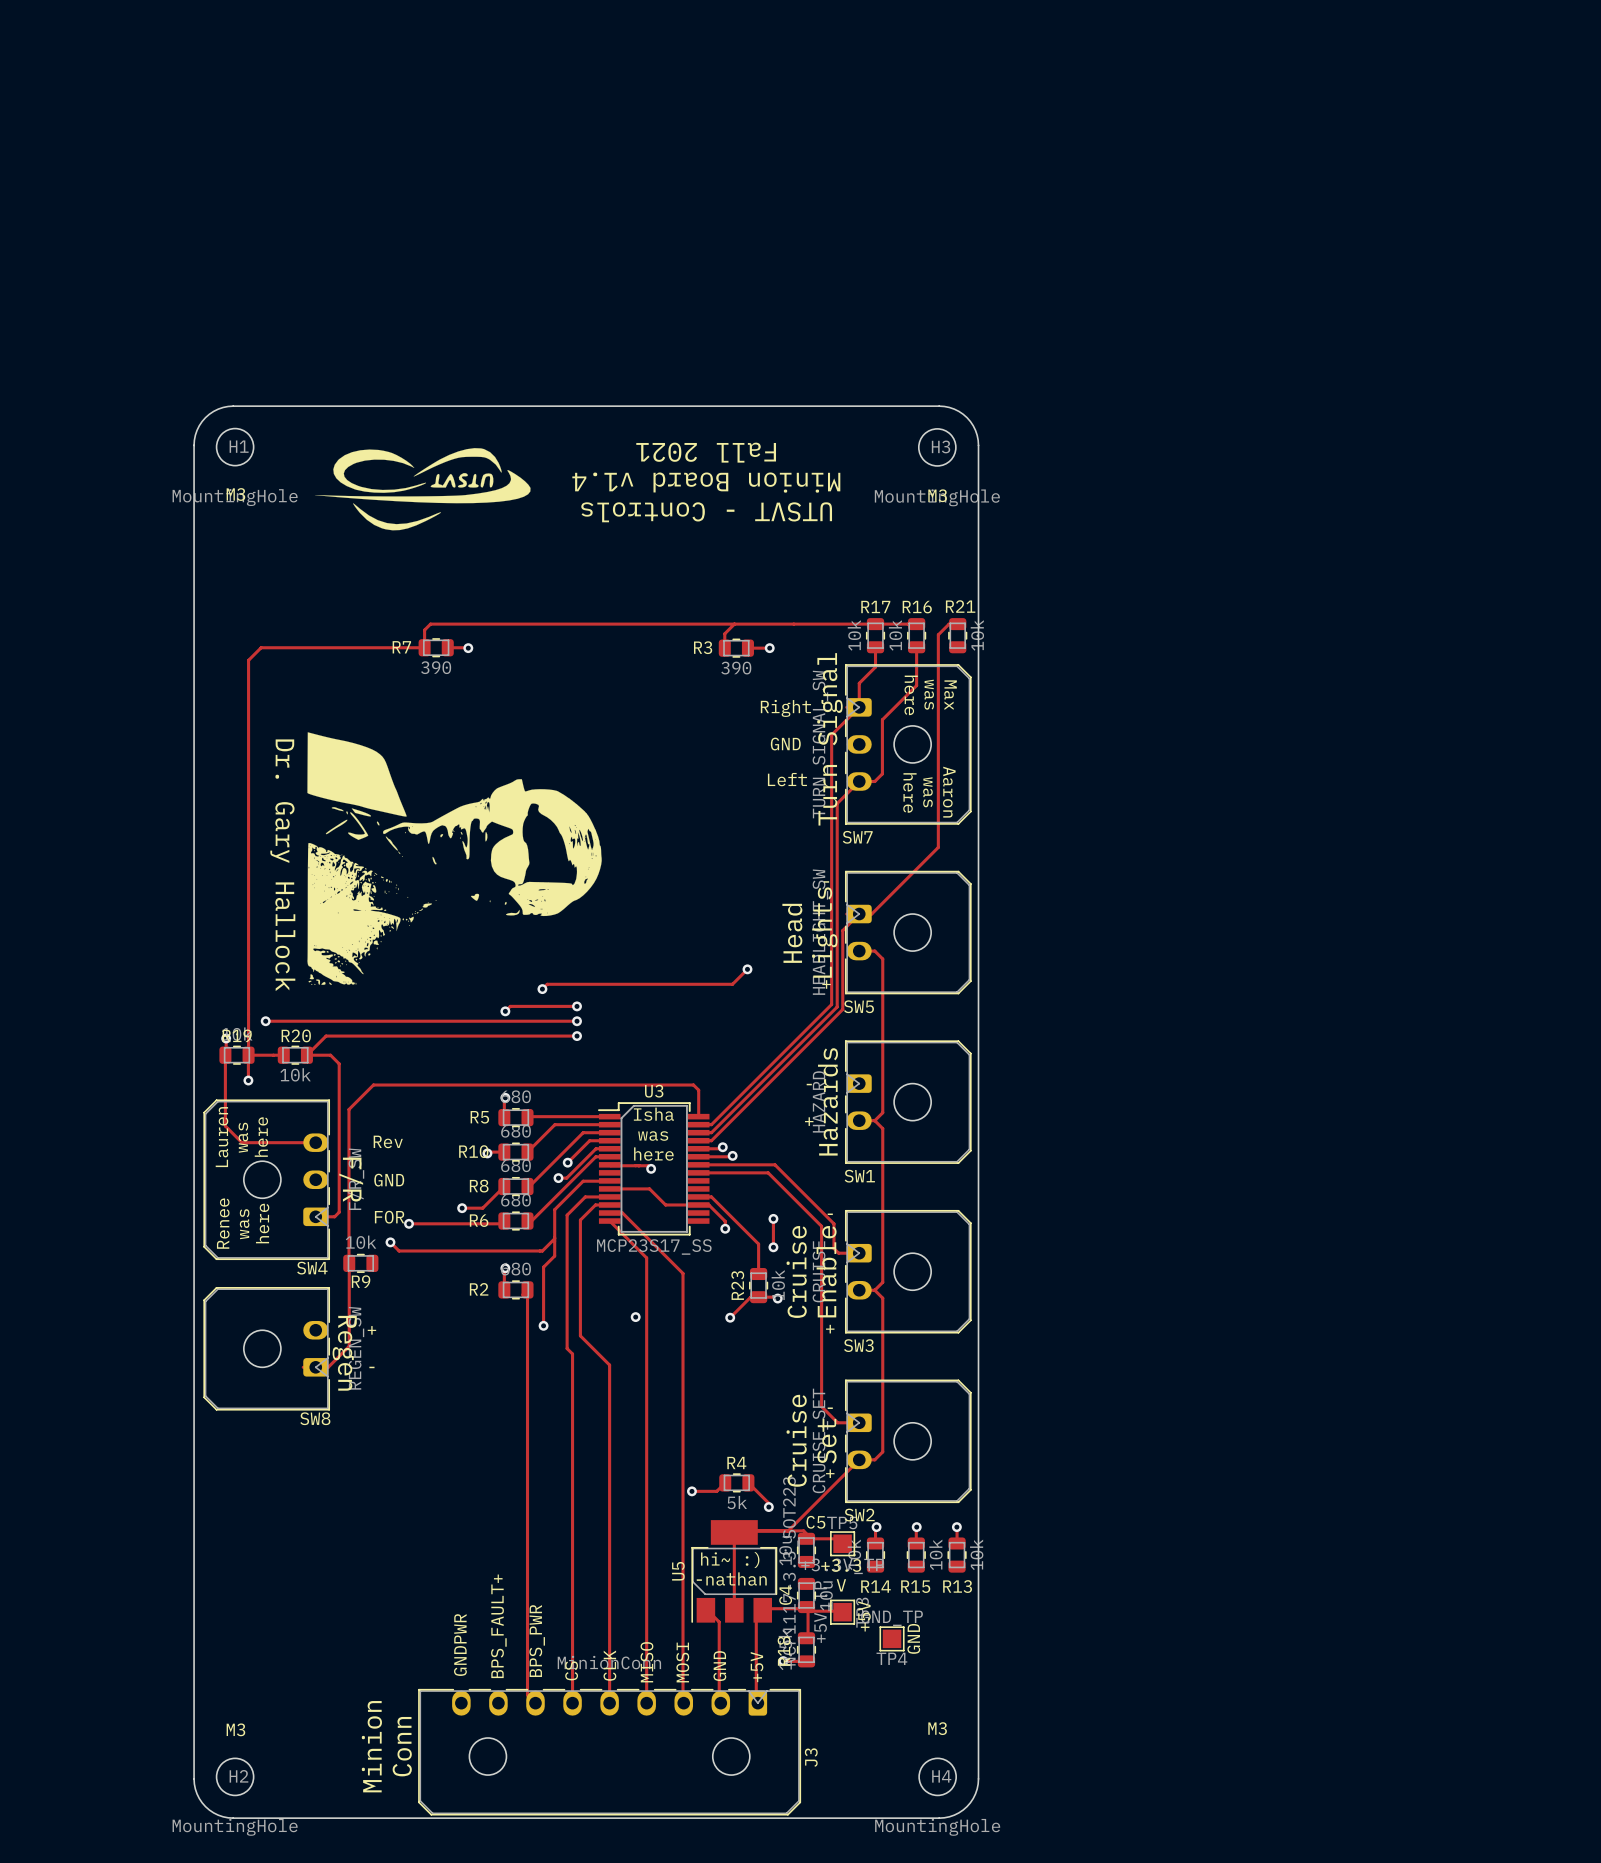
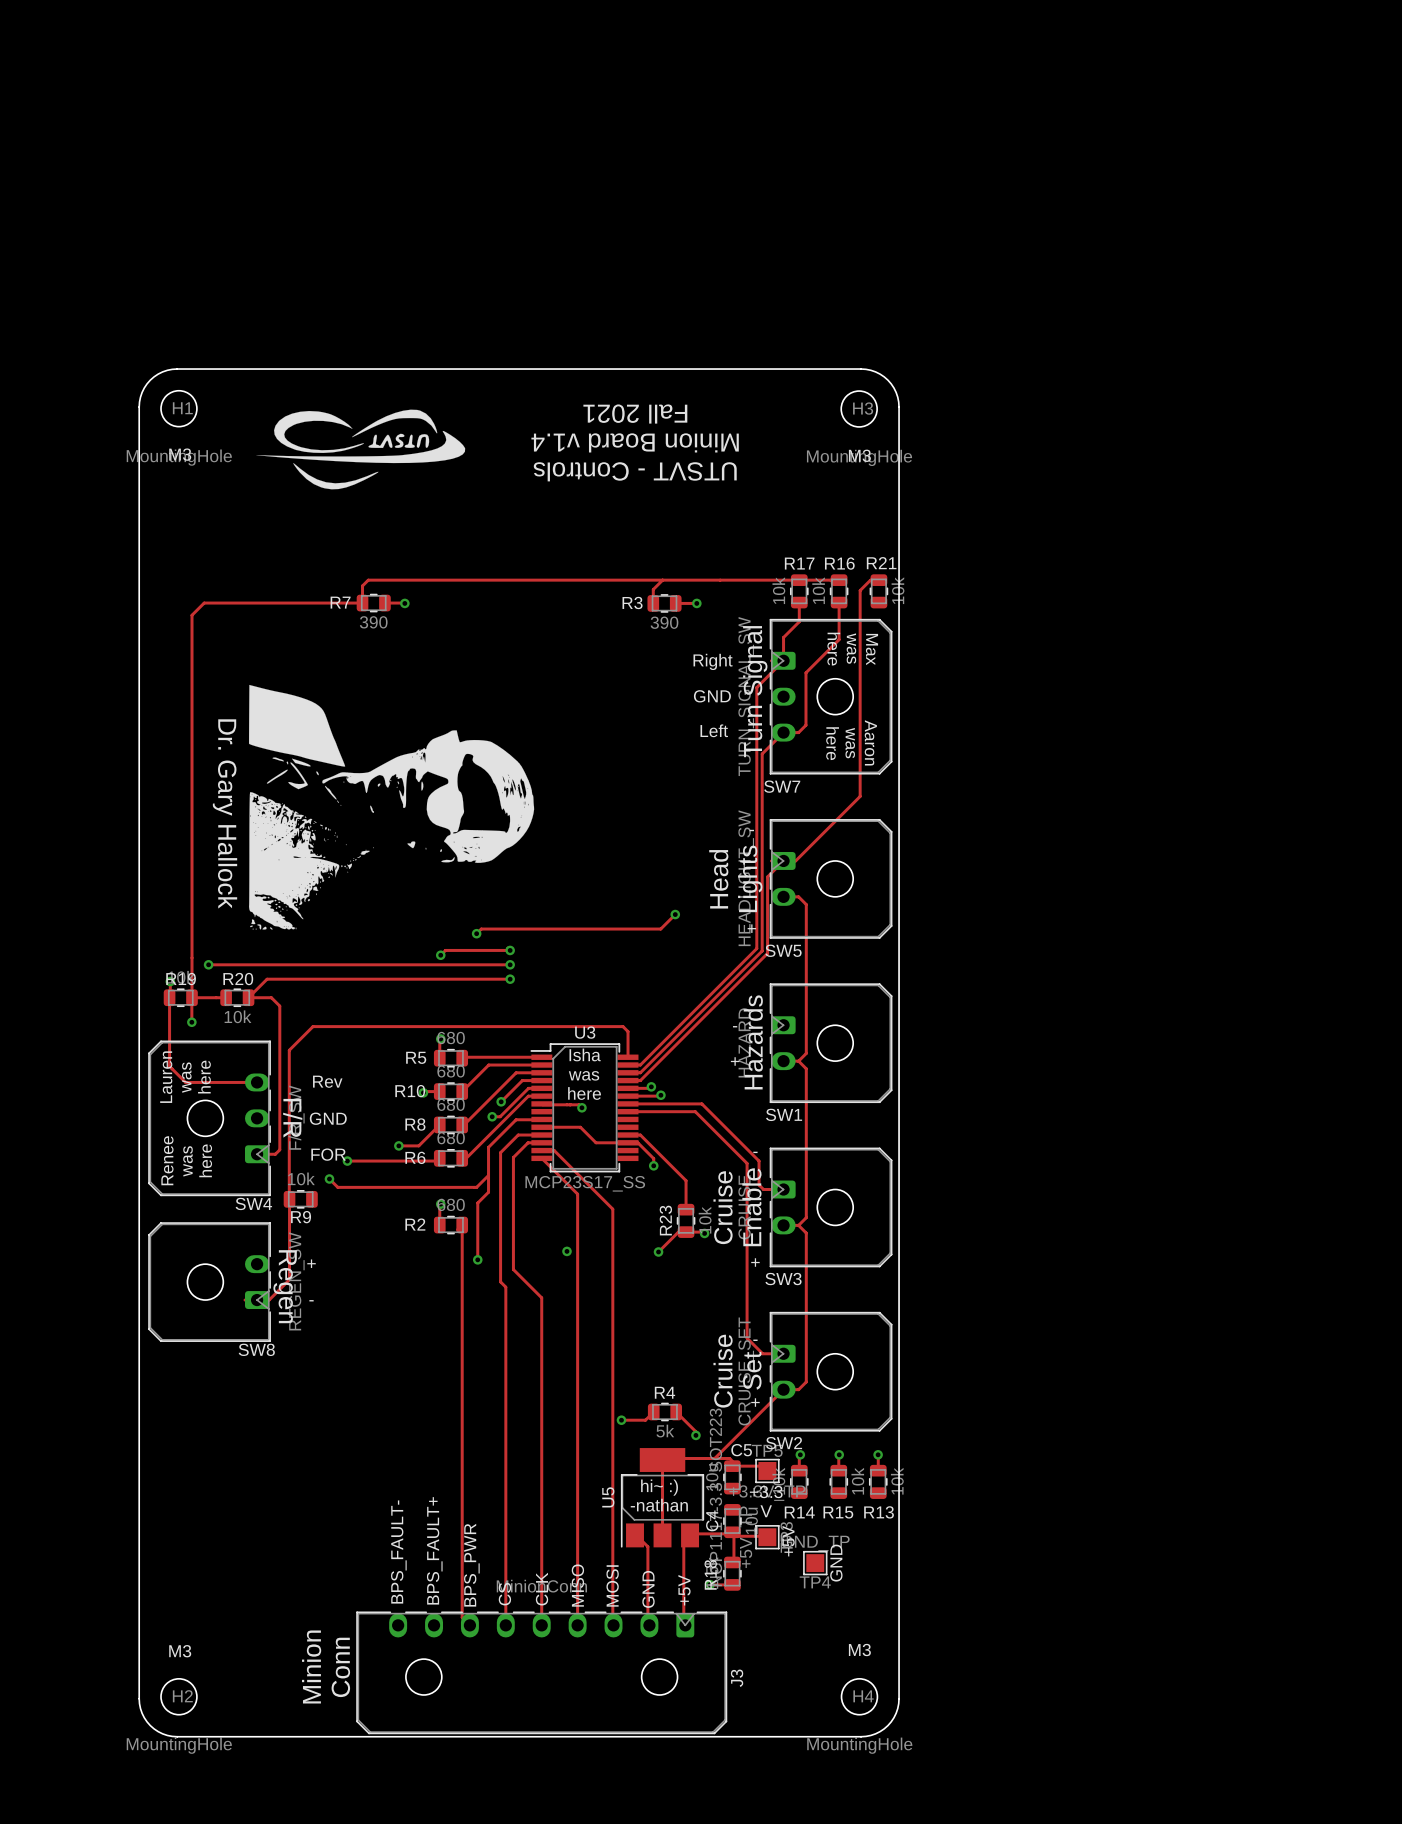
track: (773, 1218) (773, 1247) -> none
via: (773, 1218) -> none
via: (773, 1247) -> none
text: none -> BPS_FAULT- (398, 1552)
text: GNDPWR (460, 1645) -> none

